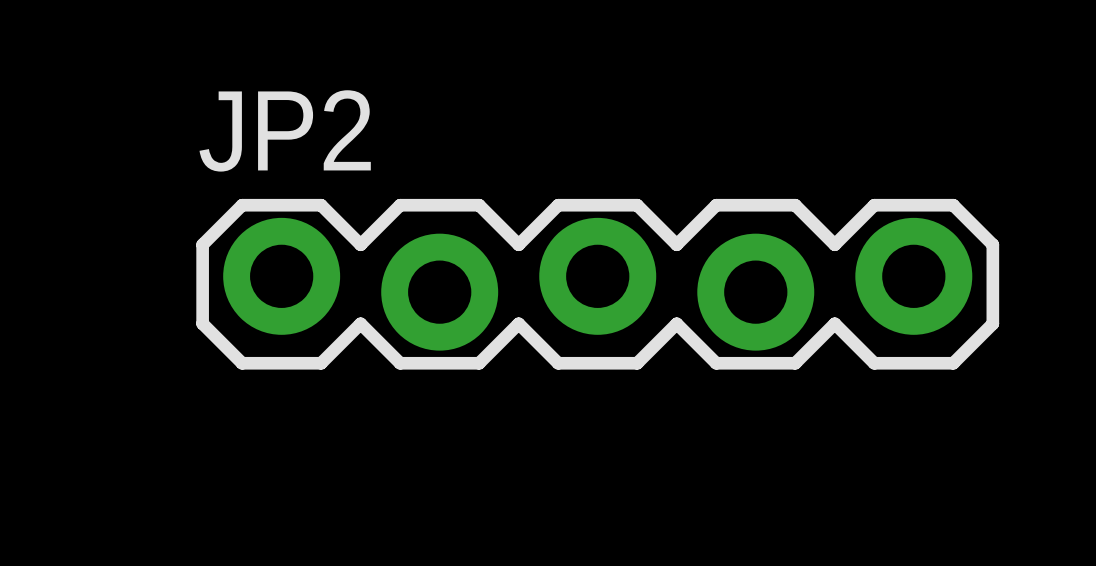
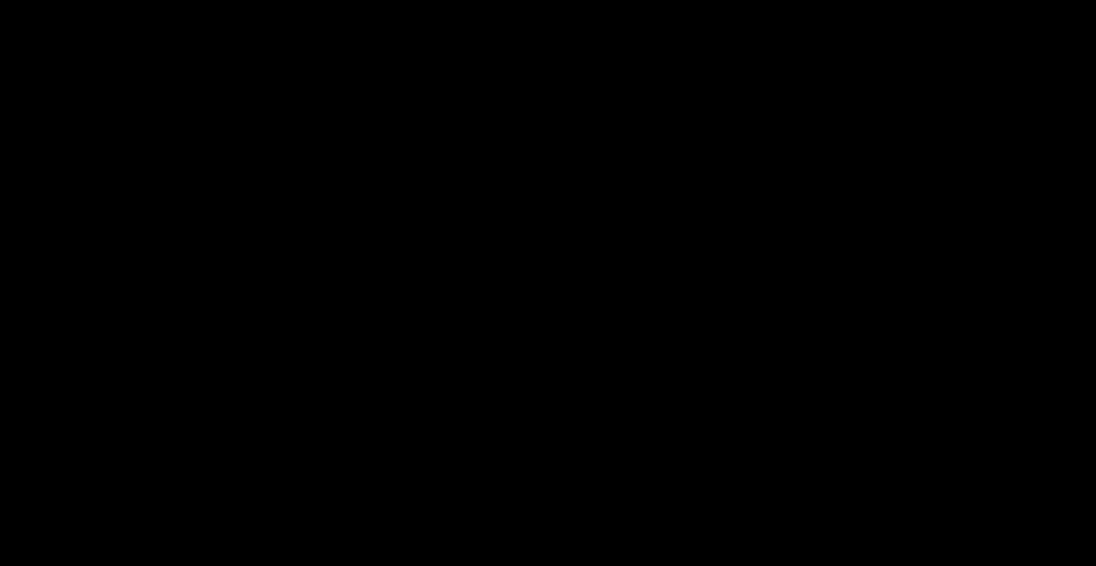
JP2: (597, 284) -> none

